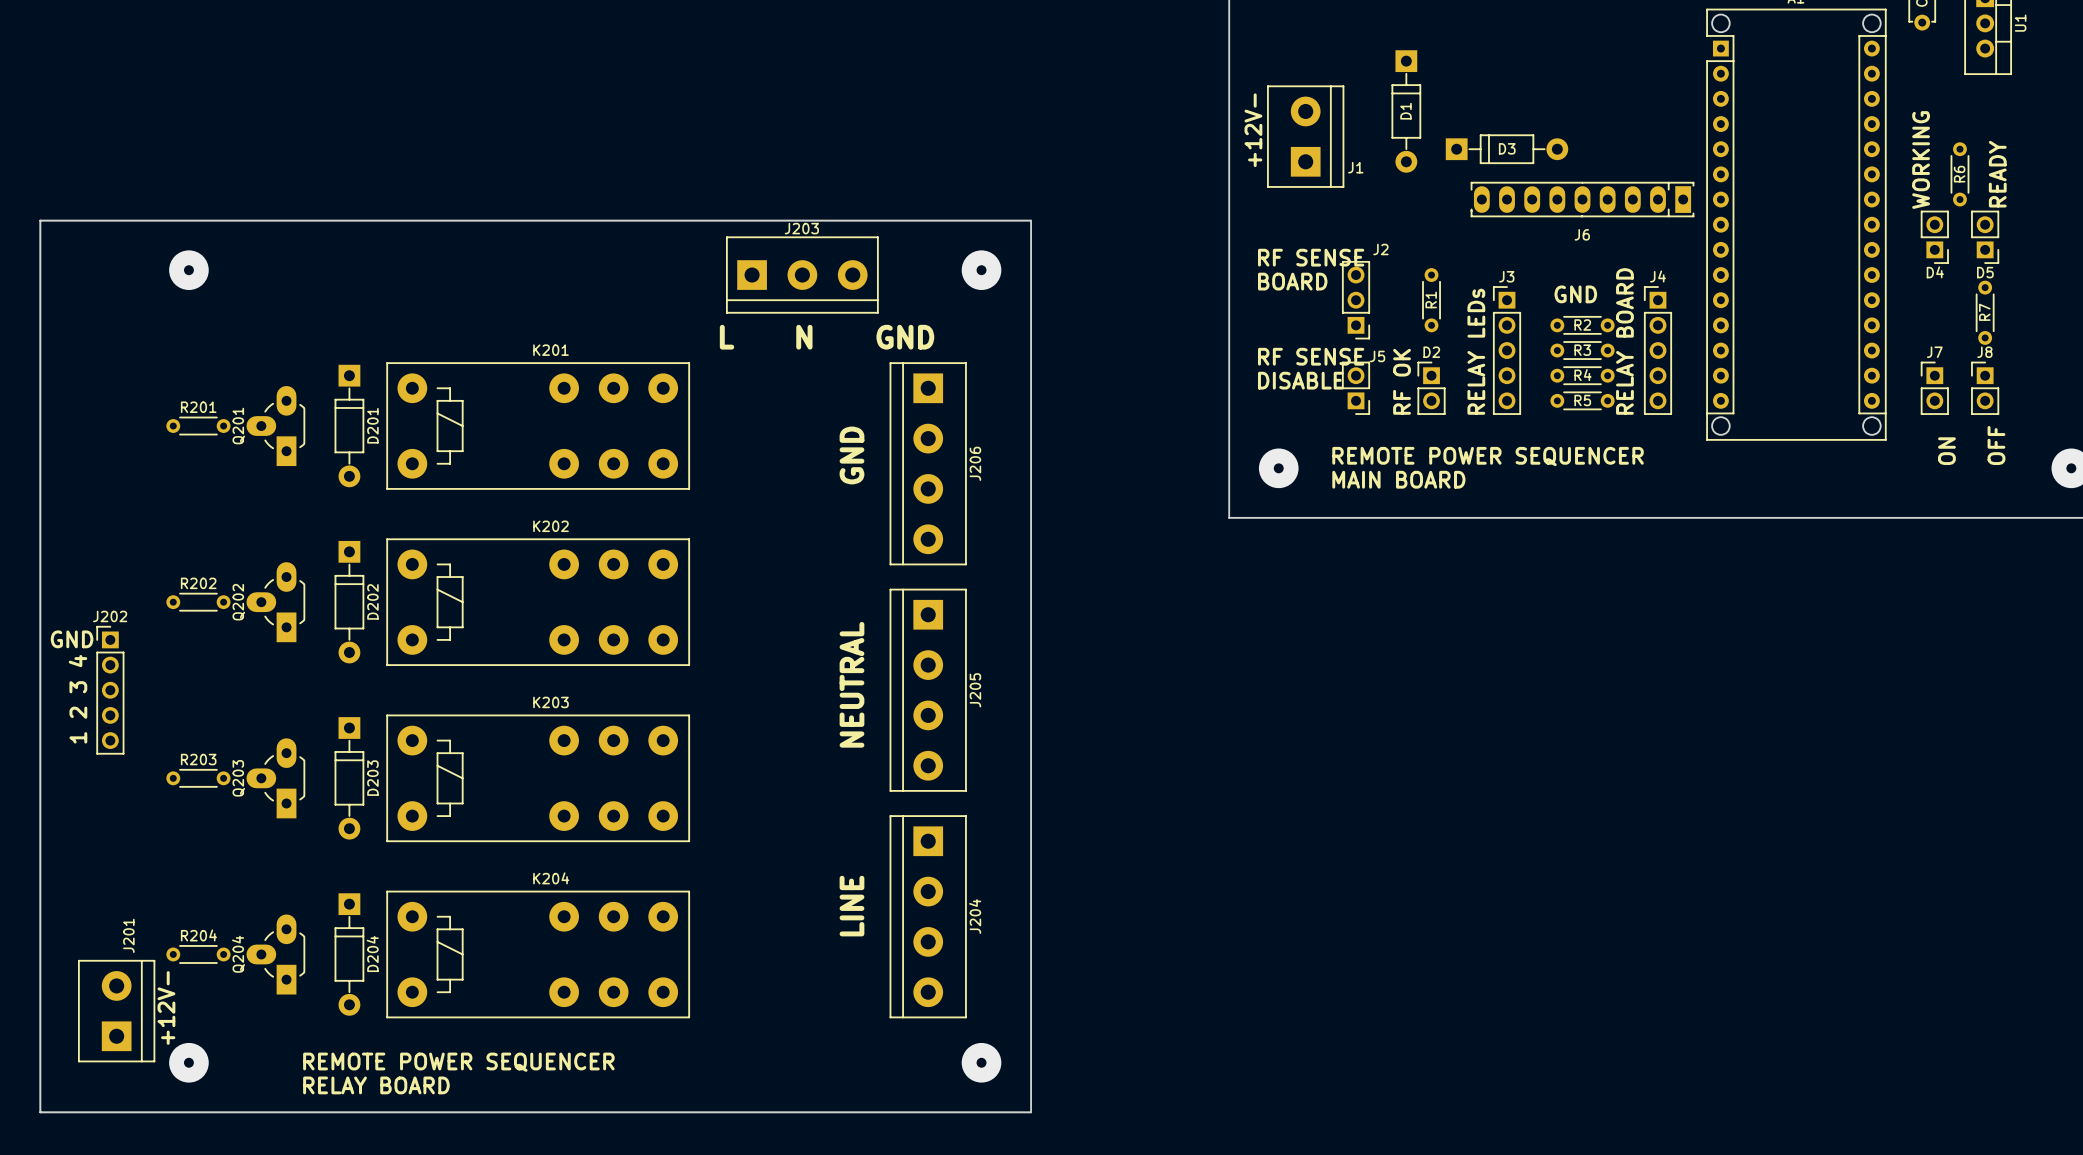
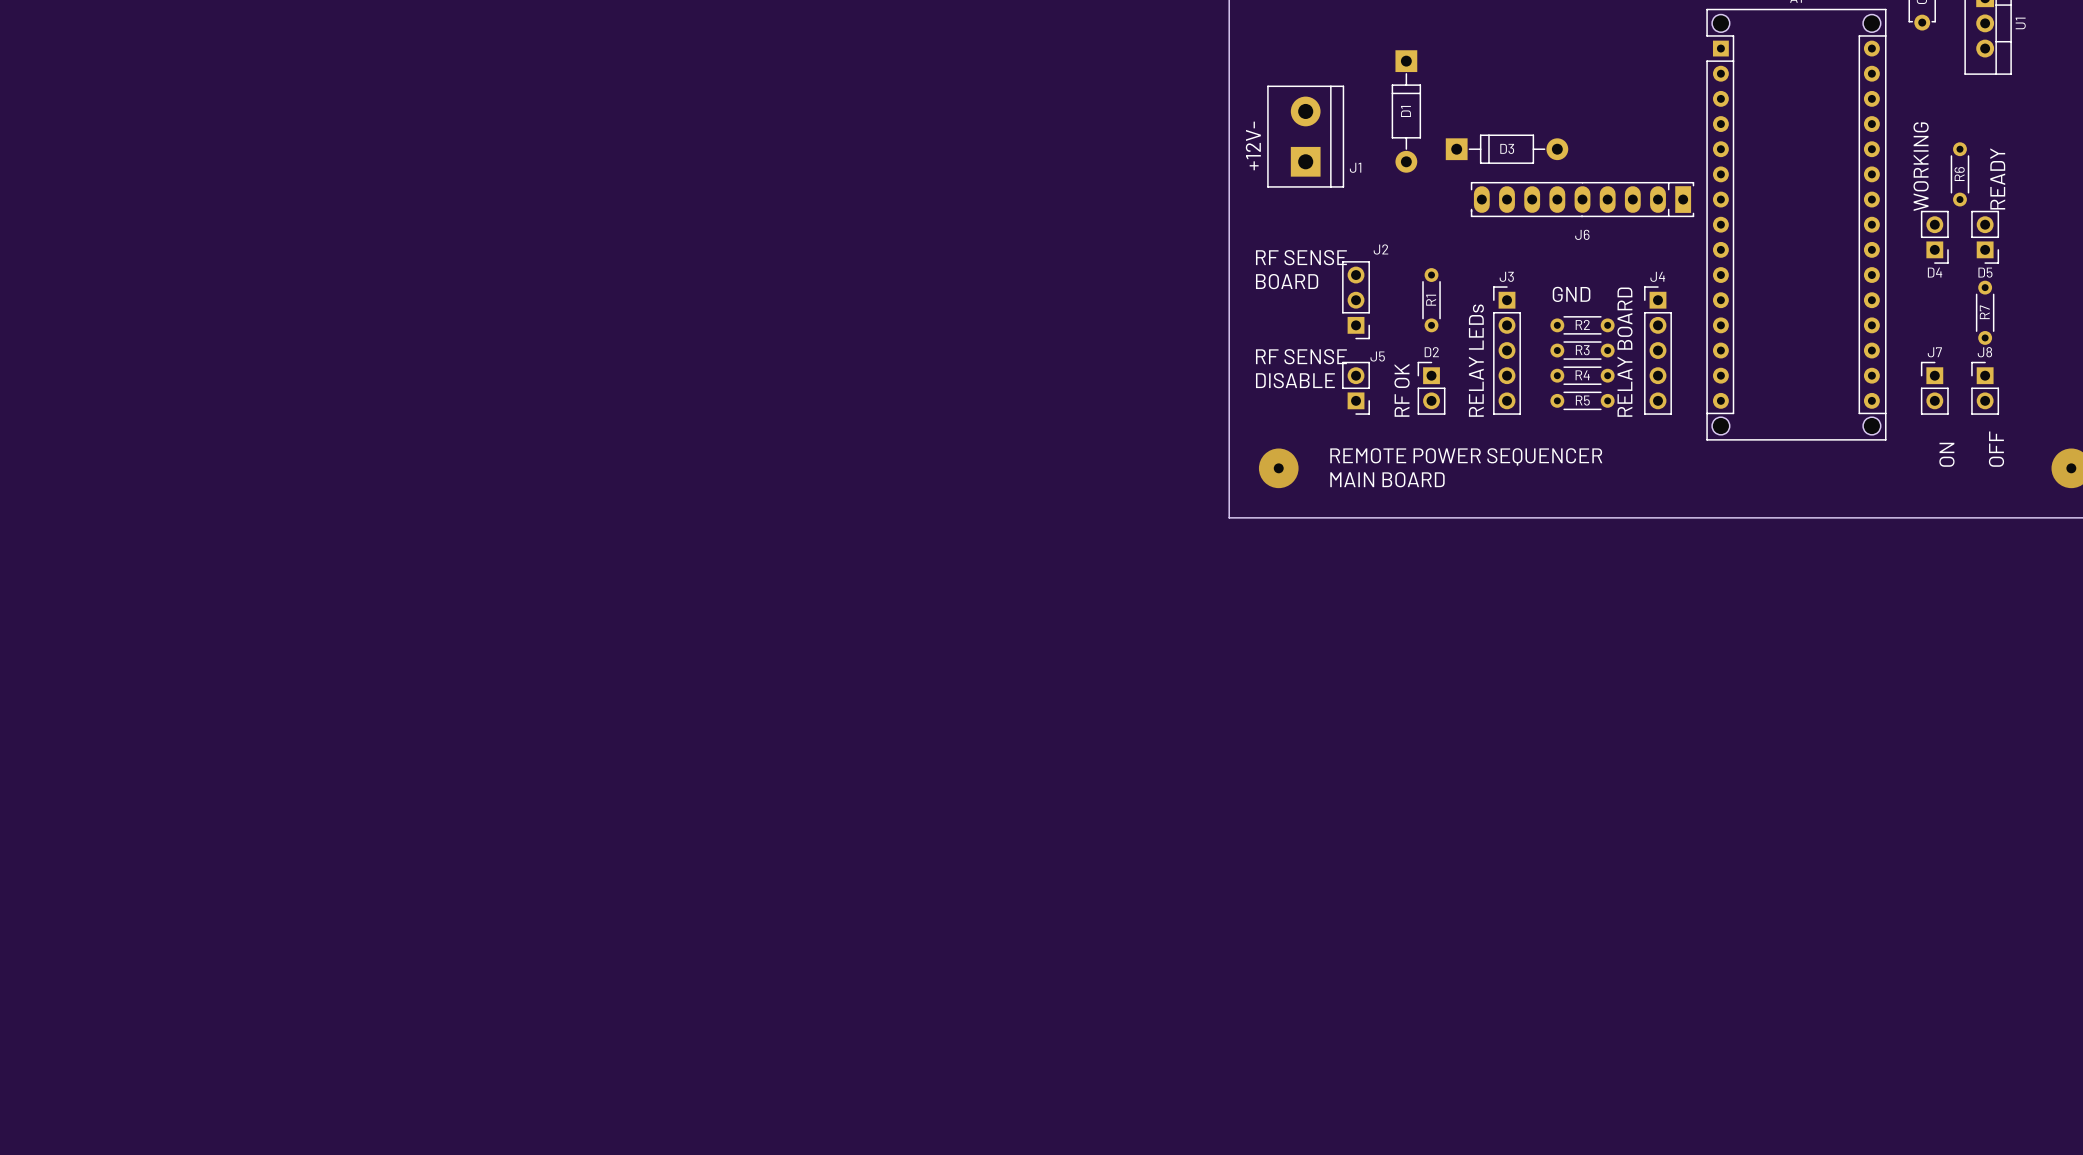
board edge: (40, 220) (1031, 220) (1031, 1112) (40, 1112) (40, 220) -> none
via: (188, 270) -> none
via: (981, 270) -> none
J203: (802, 275) -> none
text: L N GND (827, 337) -> none
R201: (198, 426) -> none
Q201: (275, 426) -> none
D201: (349, 426) -> none
K201: (538, 426) -> none
text: GND (851, 455) -> none
J206: (928, 463) -> none
R202: (198, 602) -> none
Q202: (275, 602) -> none
D202: (349, 602) -> none
K202: (538, 602) -> none
text: GND (72, 639) -> none
text: NEUTRAL (851, 684) -> none
J202: (110, 690) -> none
J205: (928, 690) -> none
text: 1 2 3 4 (78, 699) -> none
R203: (198, 778) -> none
Q203: (275, 778) -> none
D203: (349, 778) -> none
K203: (538, 778) -> none
text: LINE (851, 906) -> none
J204: (928, 916) -> none
R204: (198, 954) -> none
Q204: (275, 954) -> none
D204: (349, 954) -> none
K204: (538, 954) -> none
text: +12V- (166, 1007) -> none
J201: (116, 1011) -> none
via: (188, 1062) -> none
text: REMOTE POWER SEQUENCER (458, 1062) -> none
via: (981, 1062) -> none
text: RELAY BOARD (376, 1085) -> none

